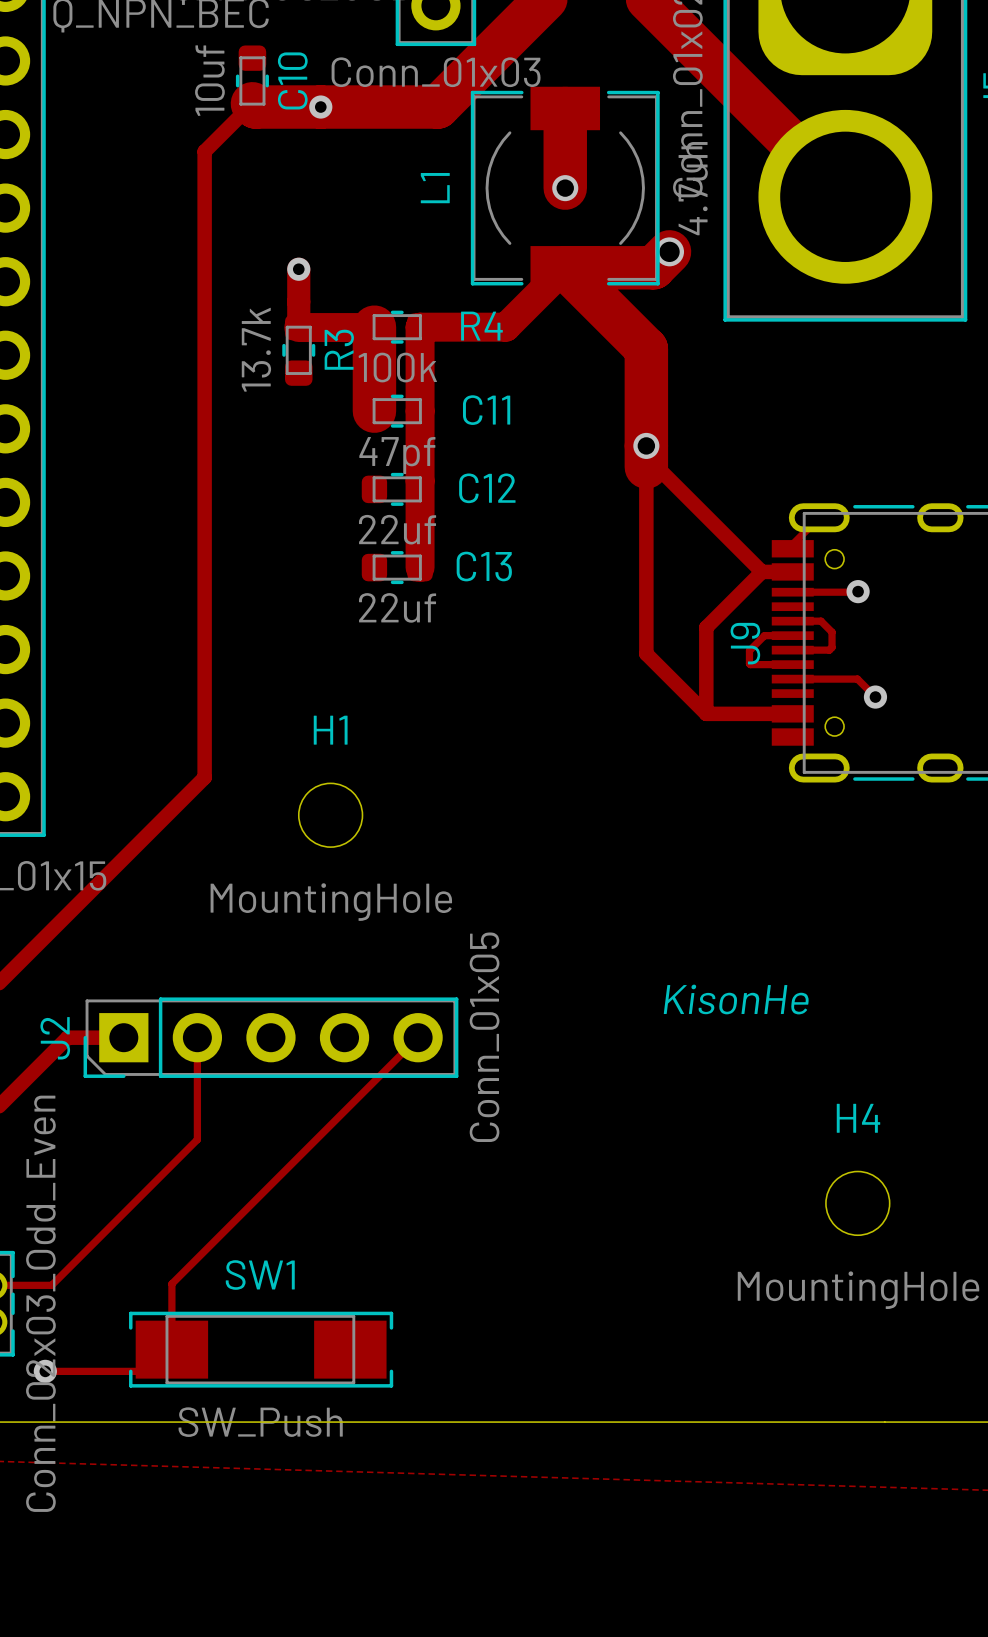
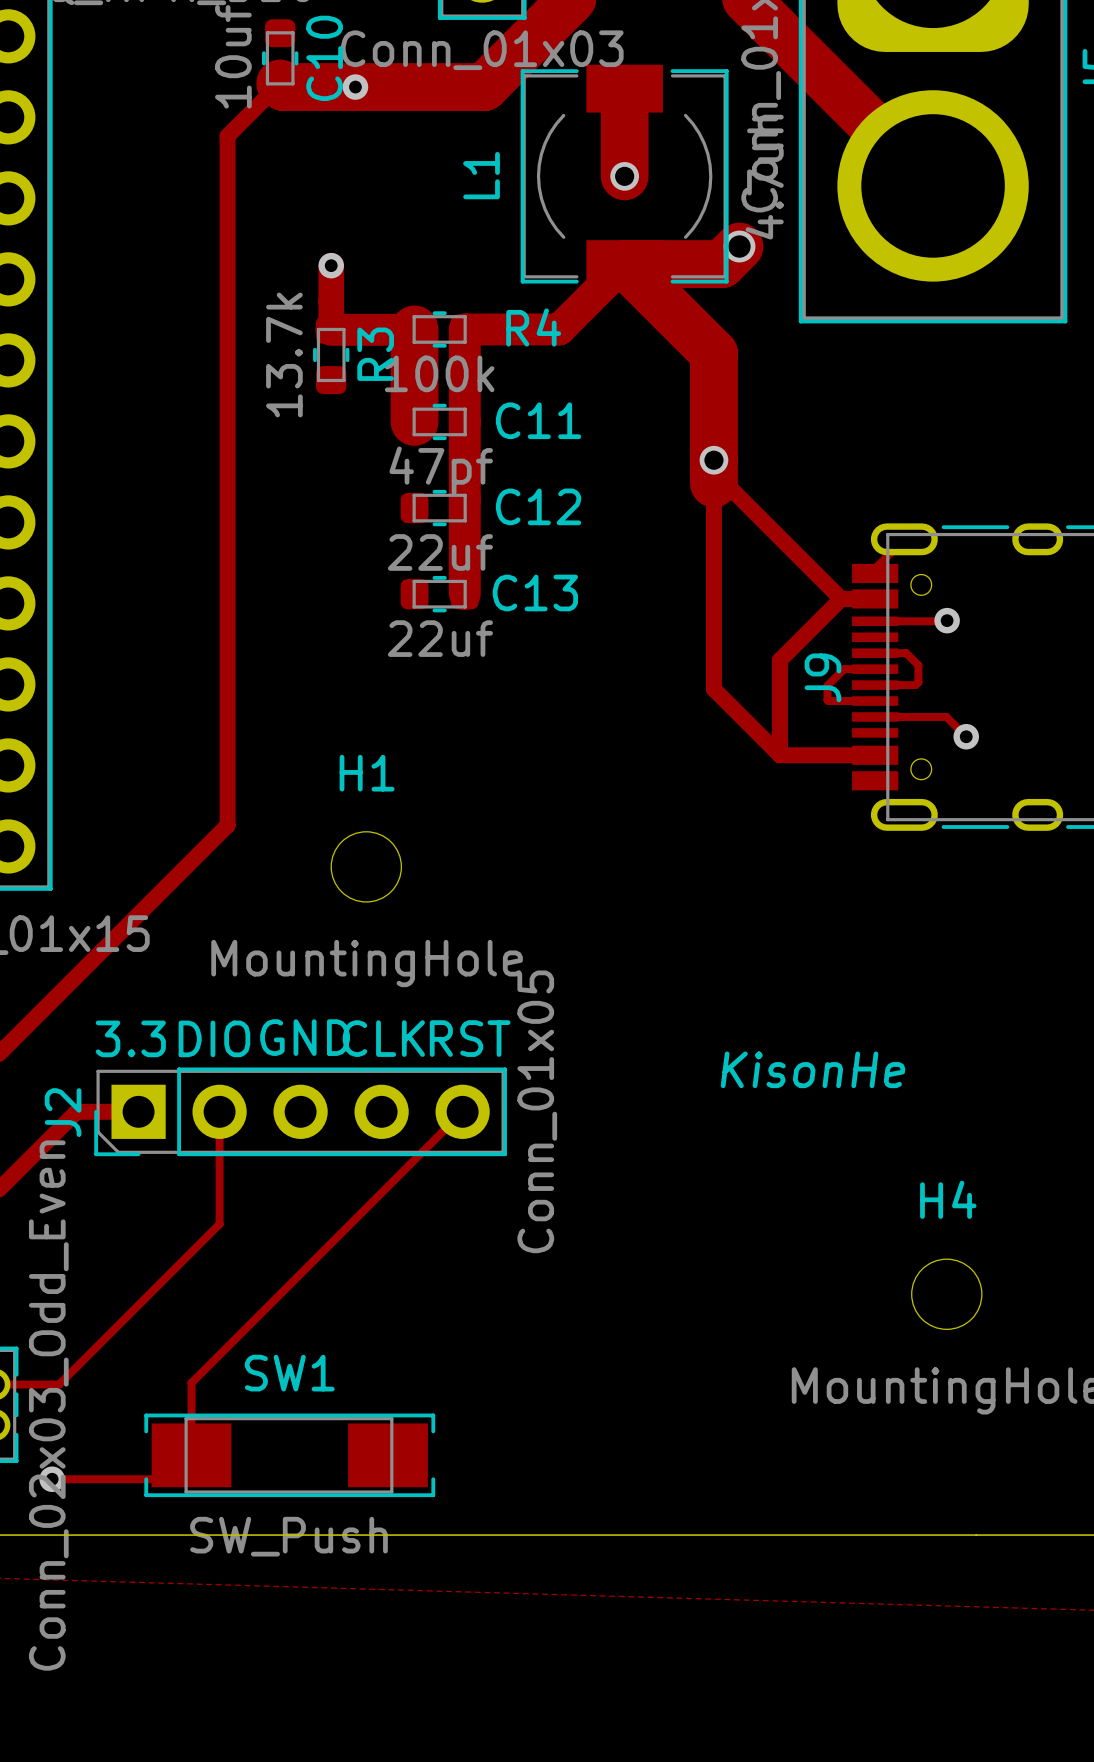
text: none -> GND (305, 1037)
text: none -> 3.3 (130, 1038)
text: none -> DIO (214, 1038)
text: none -> CLK (383, 1038)
text: none -> RST (470, 1038)

